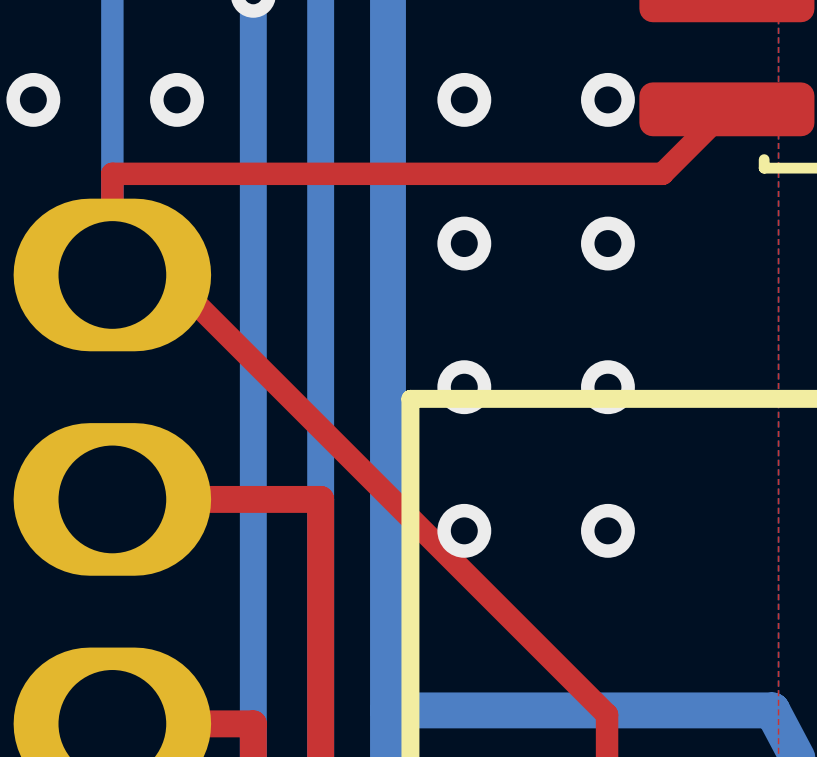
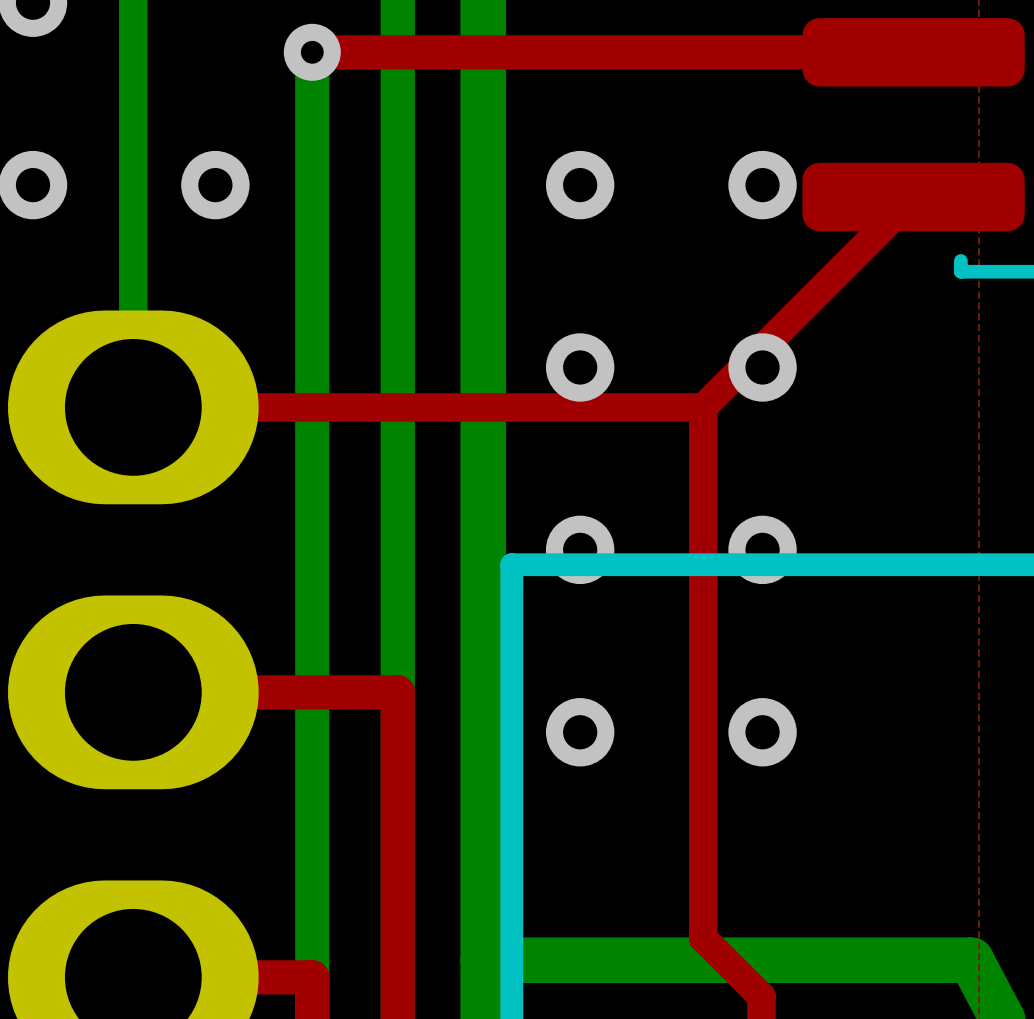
top track: (662, 173) (112, 173) (112, 274) -> (703, 407) (133, 407)
top track: none -> (831, 278) (703, 407)
top track: (112, 220) (607, 714) (607, 738) -> (703, 407) (703, 938) (761, 996)

